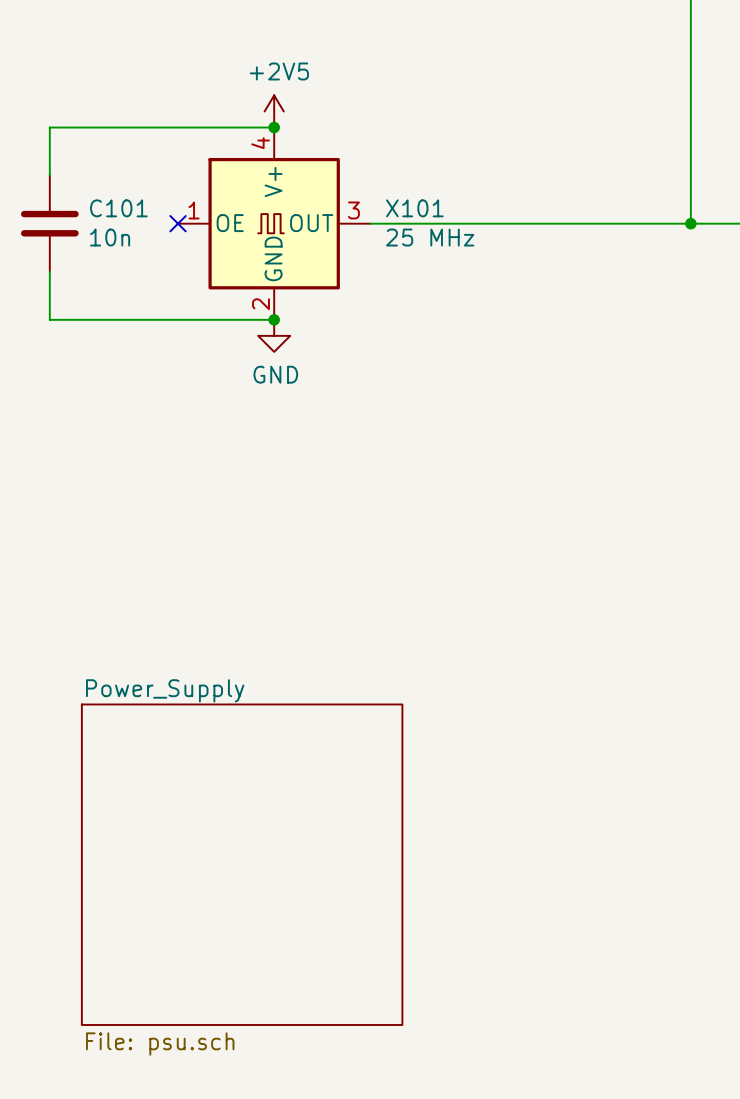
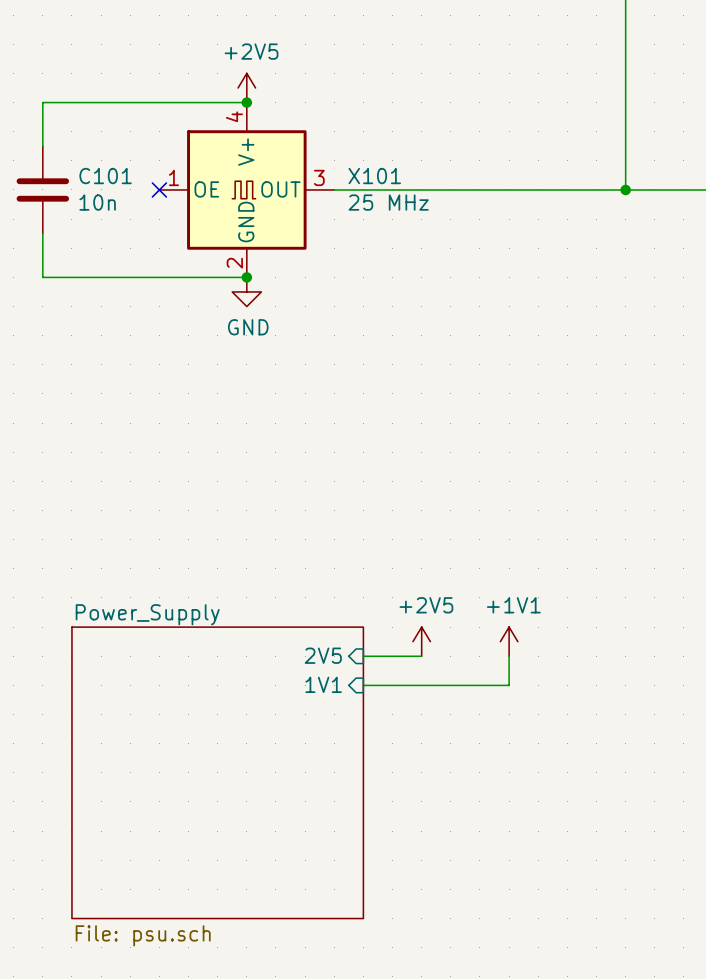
power symbol: none -> +2V5 (421, 641)
power symbol: none -> +1V1 (509, 641)
sheet pin: none -> 2V5 (323, 655)
wire: none -> (363, 656) (421, 656)
wire: none -> (509, 656) (509, 685) (363, 685)
sheet pin: none -> 1V1 (323, 684)

